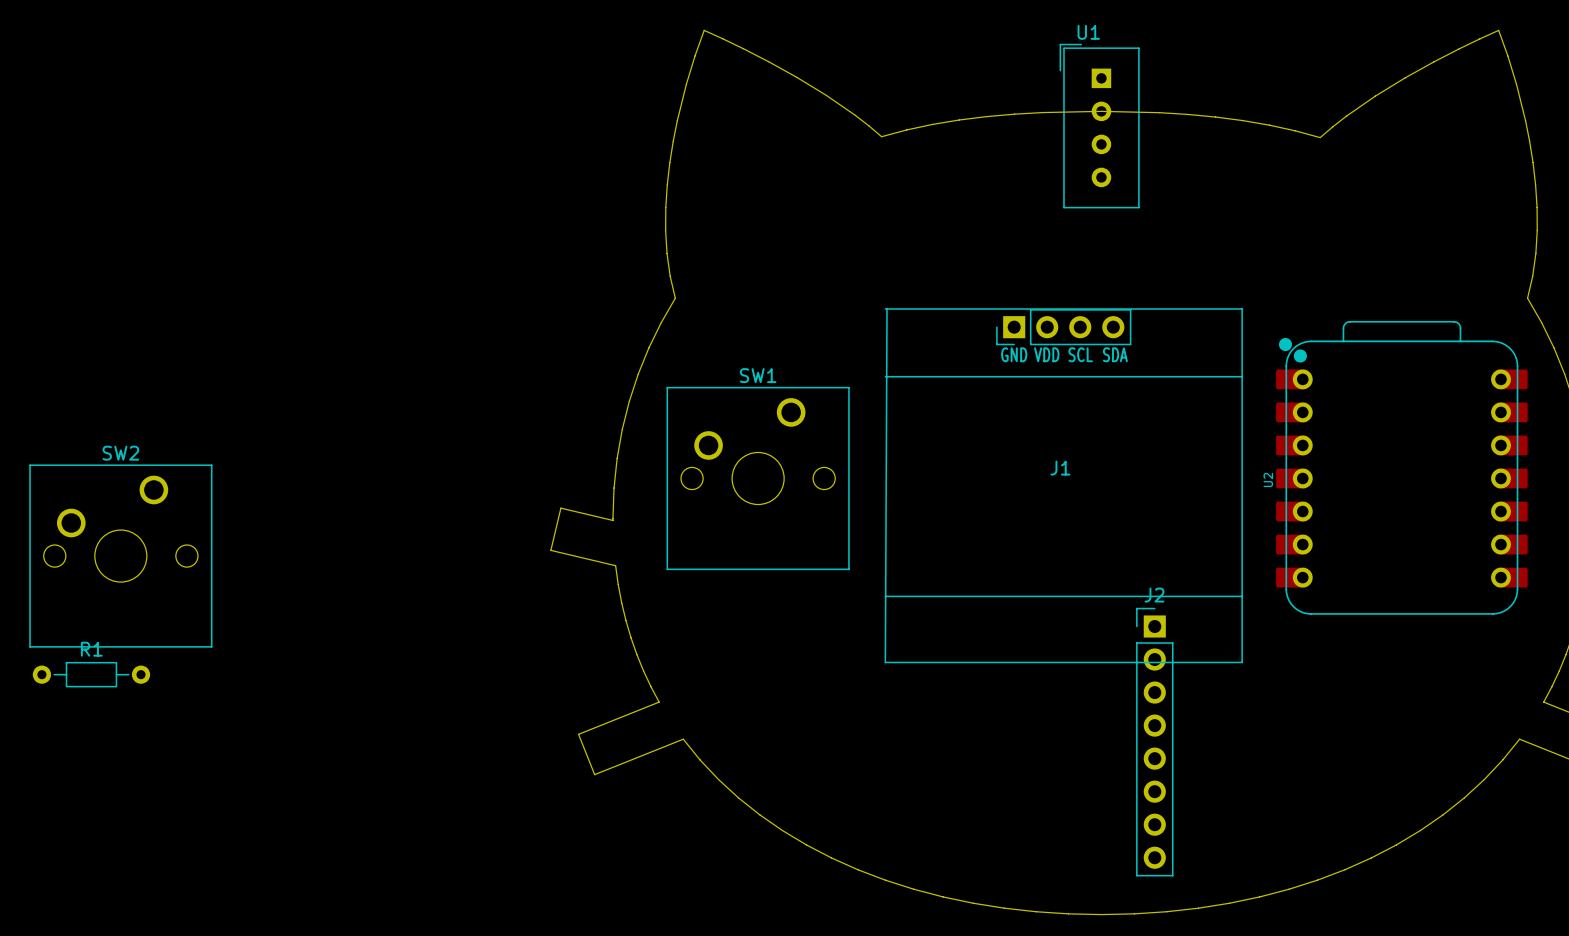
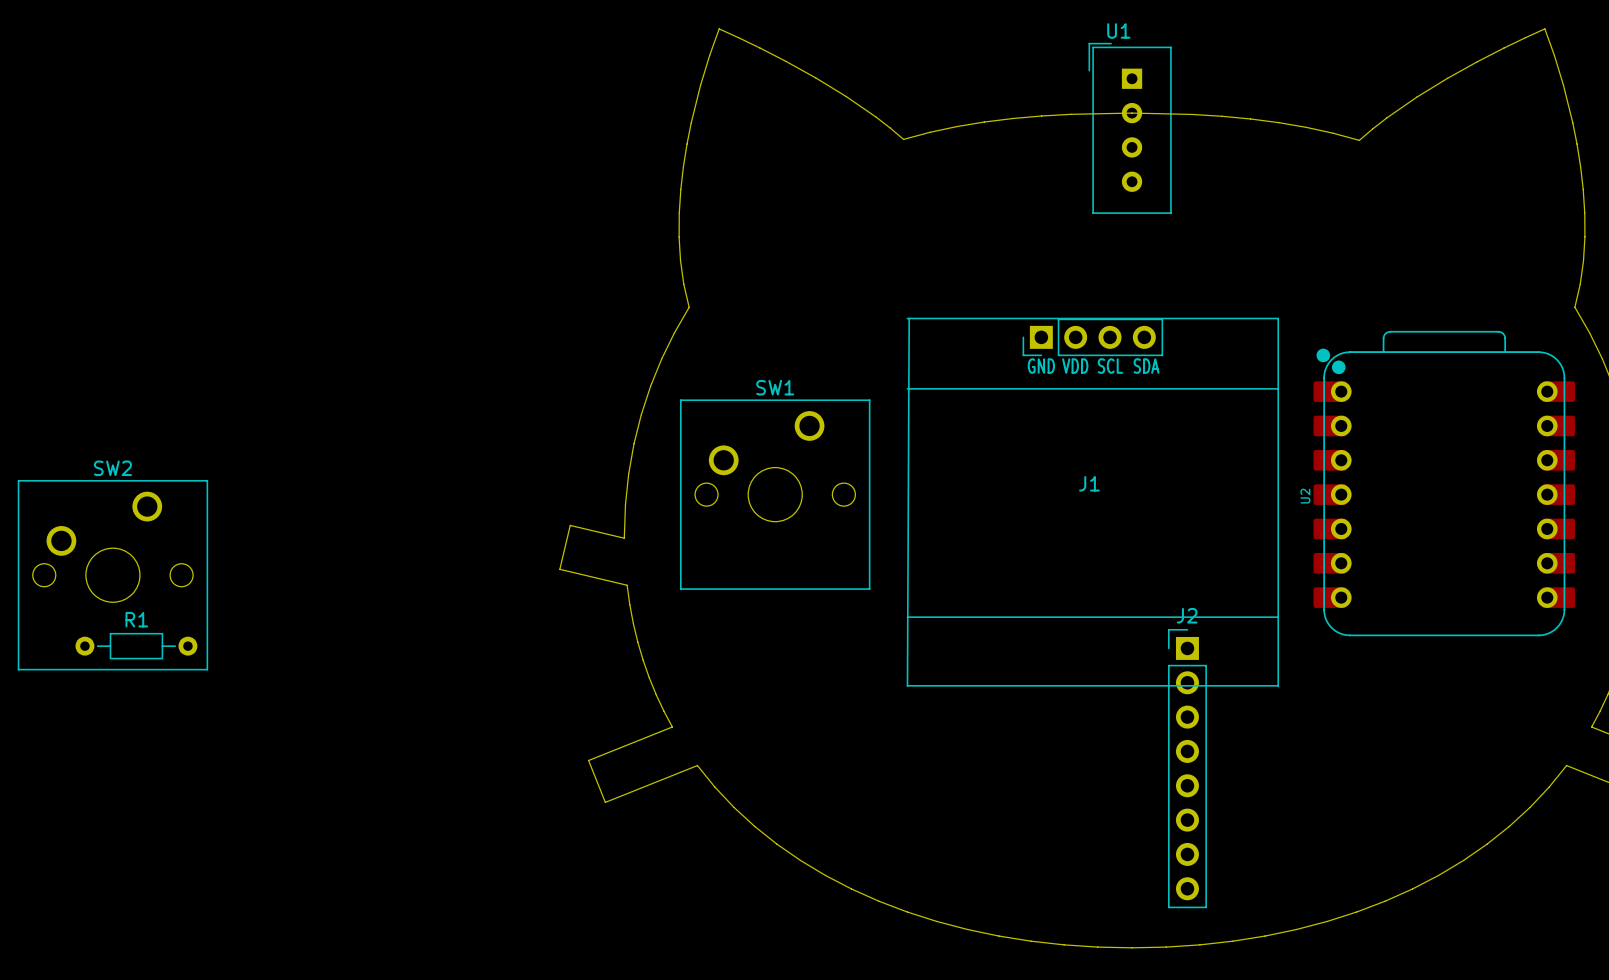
R1 position: (91, 674) -> (136, 646)

